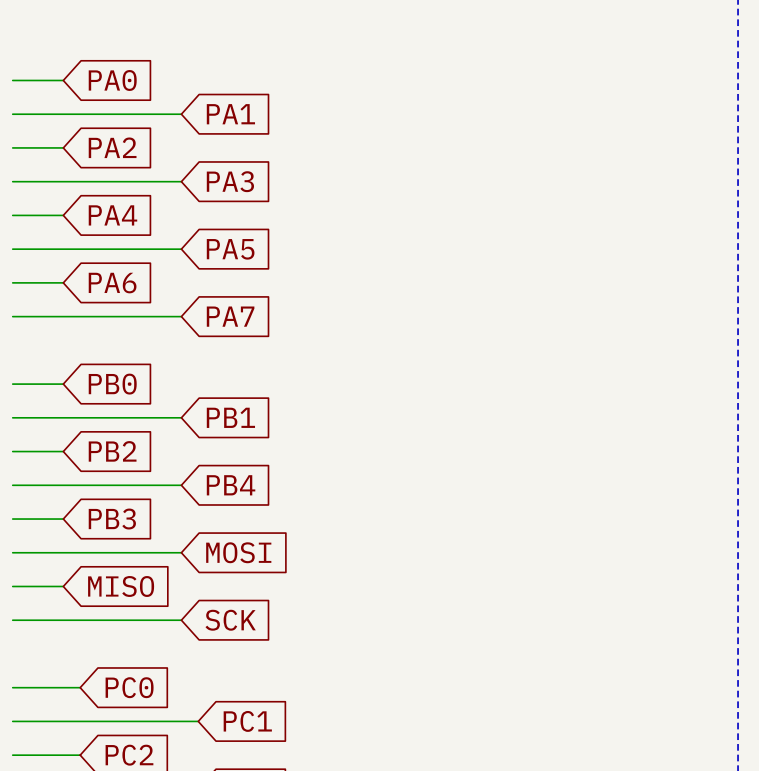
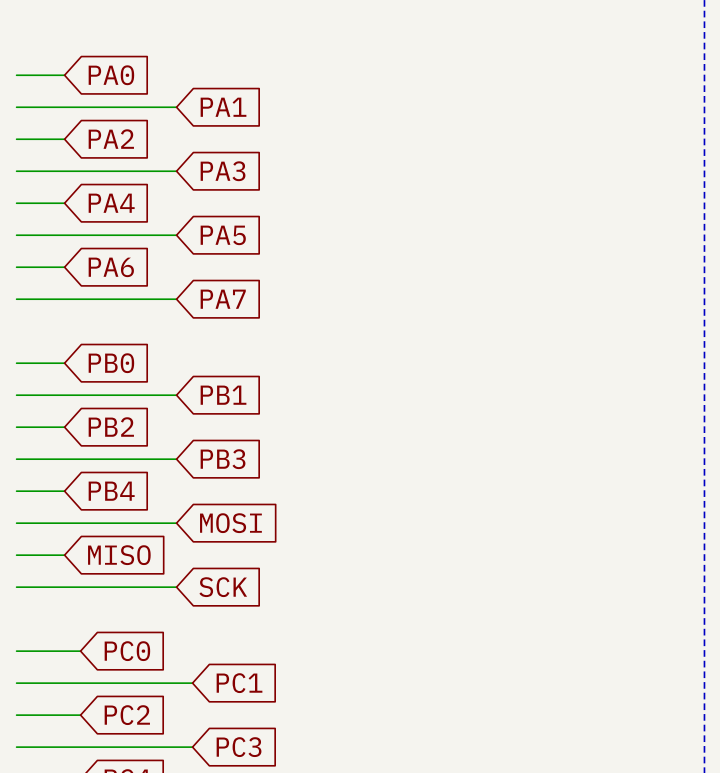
global label: PB4 (231, 485) -> PB3 (223, 459)
global label: PB3 (112, 519) -> PB4 (111, 491)

